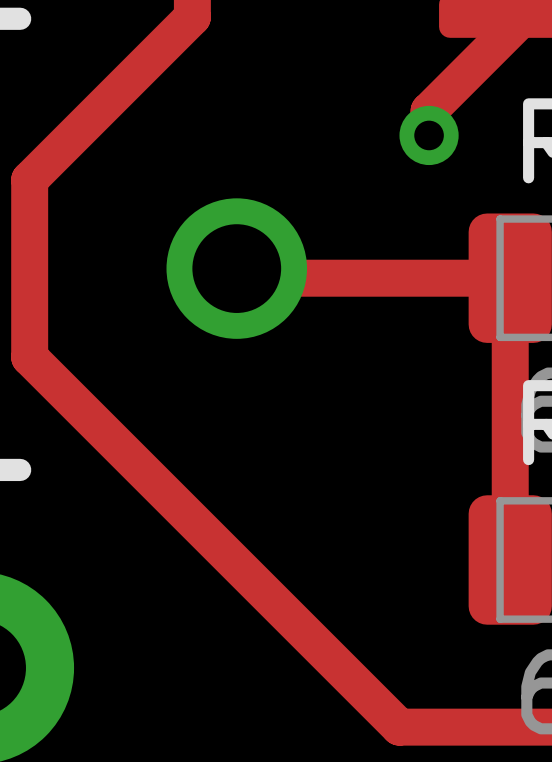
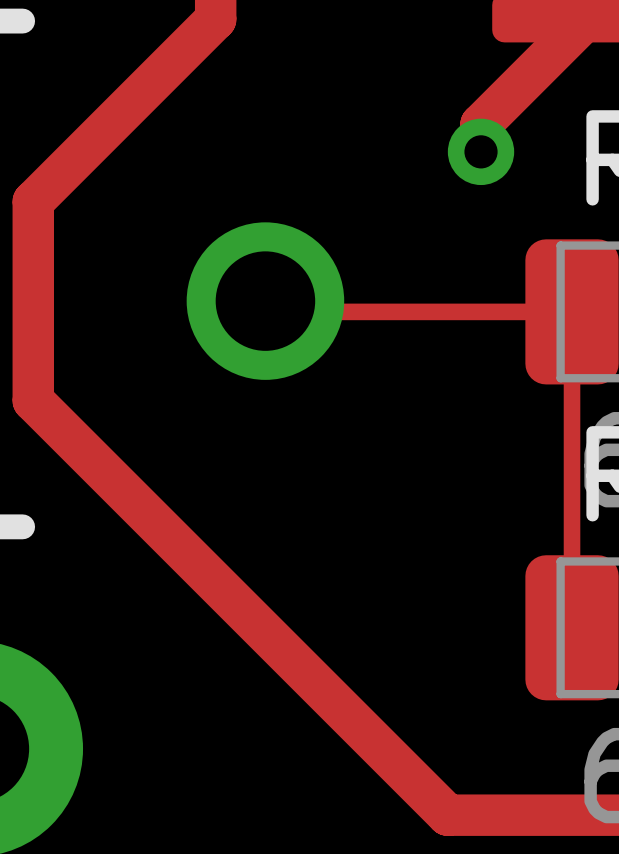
track width: thick (236, 268) (246, 278) (510, 278) (510, 559) -> thin (265, 301) (276, 311) (572, 311) (572, 627)

